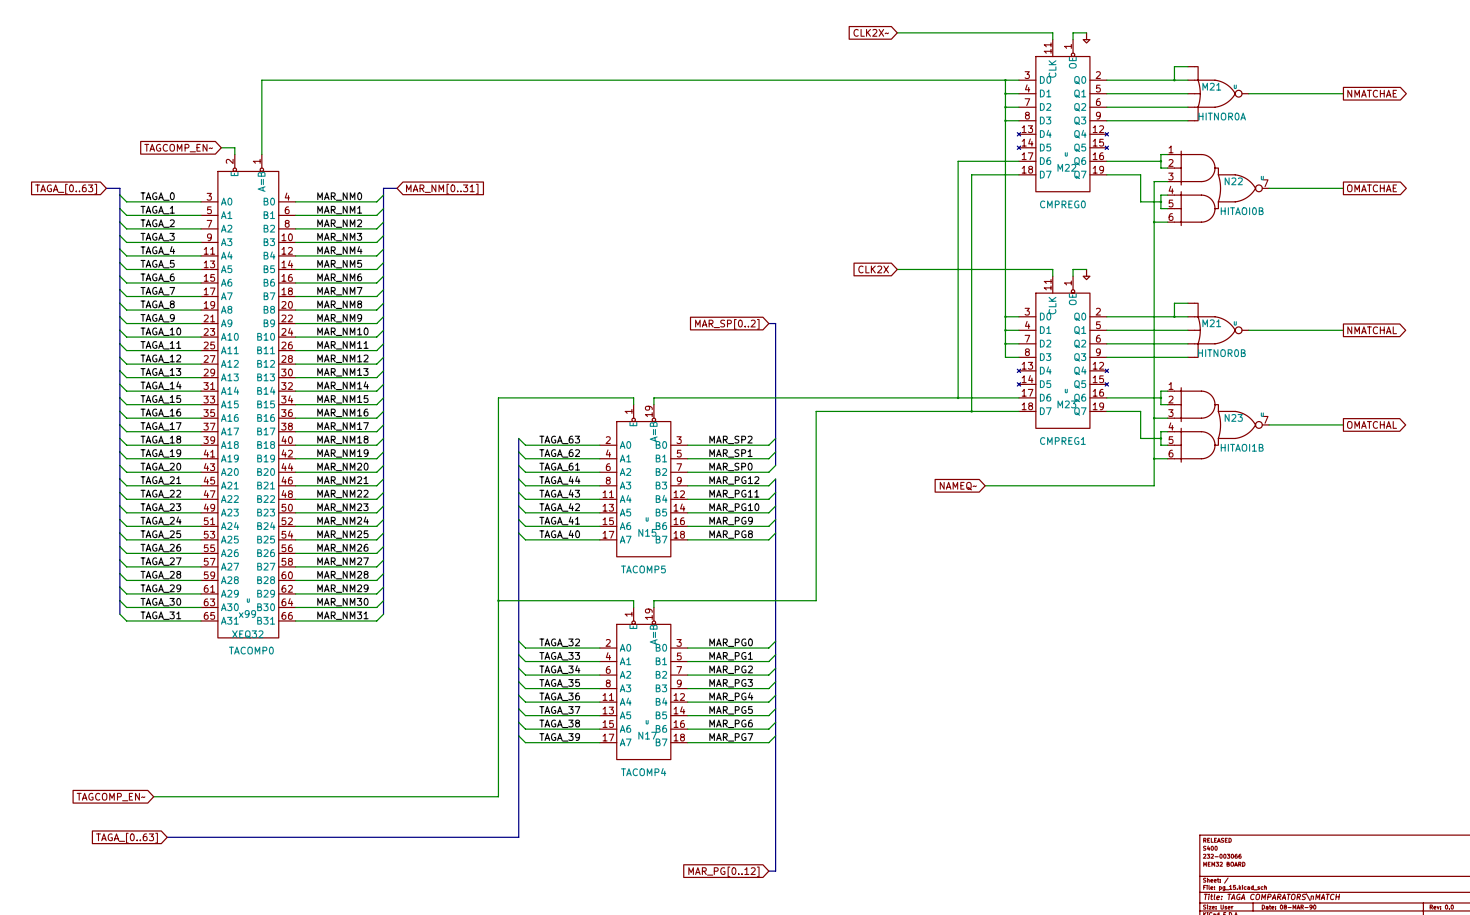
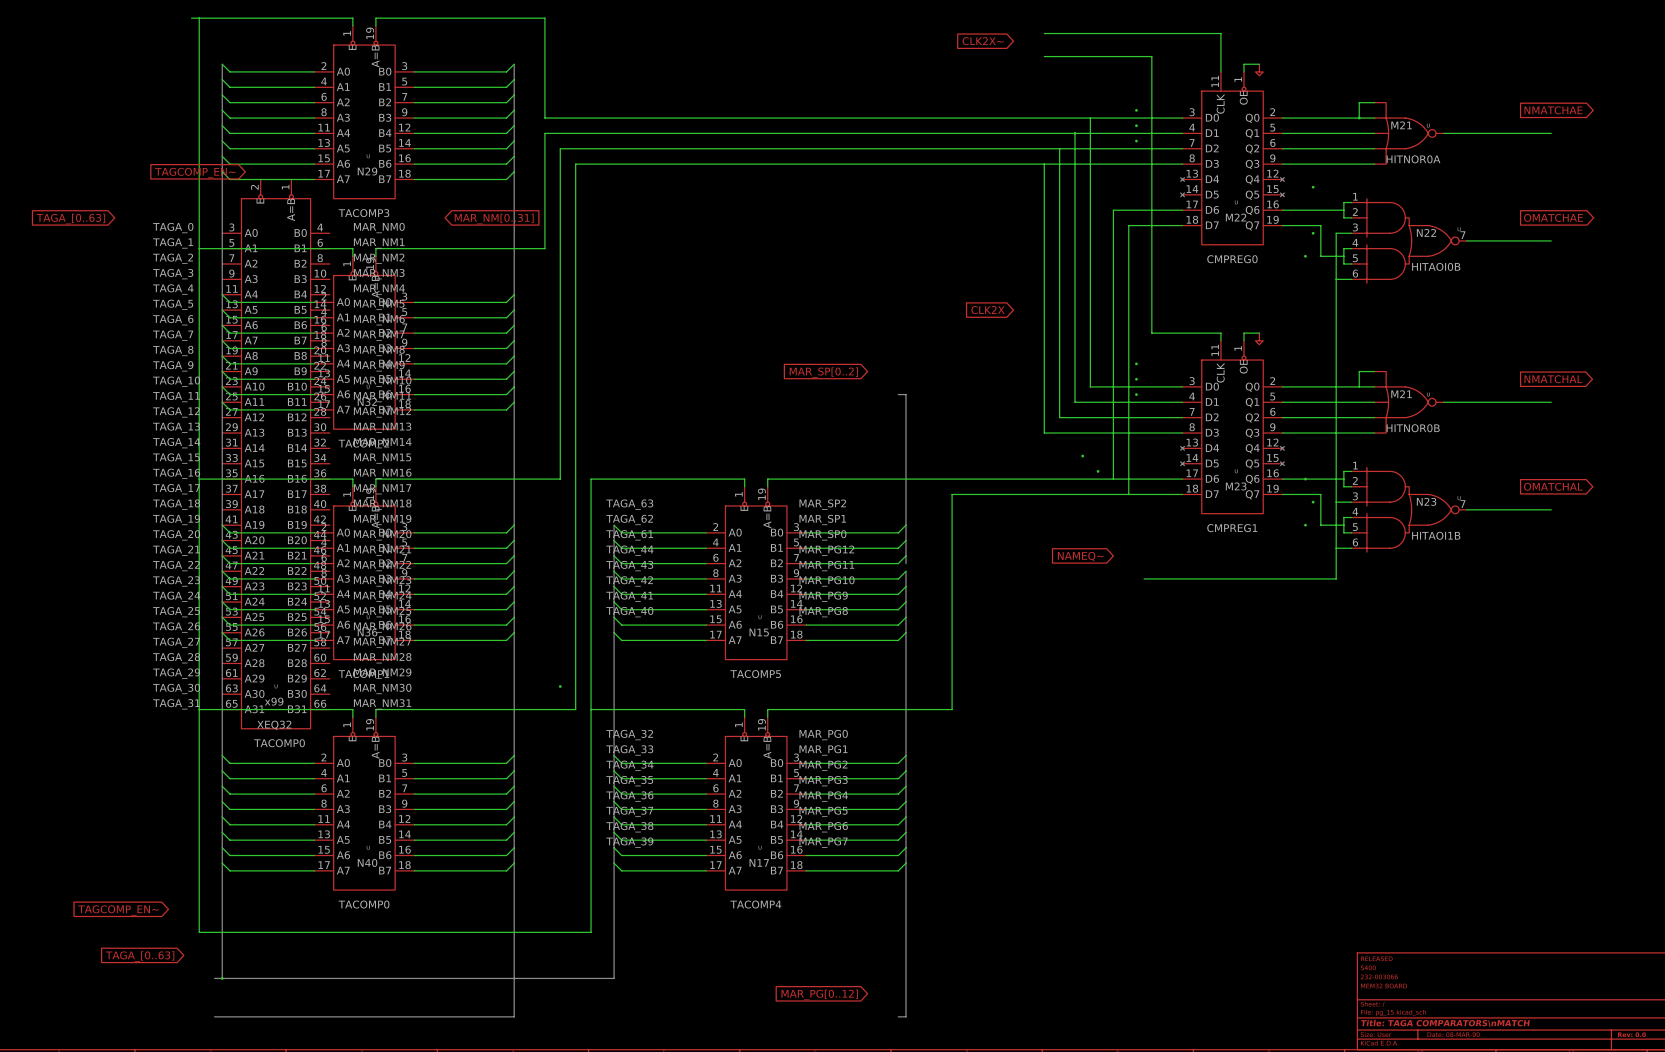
wire: none -> (191, 18) (352, 18) (352, 25)
wire: none -> (199, 18) (199, 932) (591, 932) (591, 479) (744, 479) (744, 486)
wire: none -> (375, 25) (375, 18) (544, 18) (544, 118) (1182, 118)
wire: none -> (1044, 33) (1220, 33) (1220, 71)
wire: (897, 32) (1052, 32) (1052, 39) -> none
wire: (1086, 32) (1073, 32) (1073, 39) -> (1259, 64) (1244, 64) (1244, 71)
power symbol position: (1086, 38) -> (1259, 70)
wire: none -> (1044, 56) (1151, 56) (1151, 333) (1220, 333) (1220, 340)
wire: none -> (222, 64) (229, 71) (314, 71)
bus: none -> (222, 64) (222, 978)
wire: none -> (514, 64) (506, 71) (414, 71)
bus: none -> (514, 64) (514, 1016) (214, 1016)
wire: none -> (222, 79) (229, 87) (314, 87)
wire: none -> (514, 79) (506, 87) (414, 87)
wire: (1187, 66) (1174, 66) (1174, 80) -> (1374, 102) (1359, 102) (1359, 118)
wire: none -> (222, 94) (229, 102) (314, 102)
wire: none -> (514, 94) (506, 102) (414, 102)
wire: (1005, 80) (1005, 357) (1018, 357) -> none
wire: (1018, 80) (261, 80) (261, 154) -> none
wire: (1106, 80) (1187, 80) -> (1282, 118) (1374, 118)
wire: none -> (222, 110) (229, 118) (314, 118)
wire: none -> (514, 110) (506, 118) (414, 118)
wire: (1005, 93) (1018, 93) -> none
wire: (1106, 93) (1187, 93) -> (1282, 133) (1374, 133)
part position: (1218, 93) -> (1409, 133)
wire: (1248, 93) (1343, 93) -> (1443, 133) (1551, 133)
part: none -> (364, 112)
wire: none -> (1090, 118) (1090, 386) (1182, 386)
wire: none -> (222, 125) (229, 133) (314, 133)
wire: none -> (514, 125) (506, 133) (414, 133)
wire: (1005, 107) (1018, 107) -> none
wire: (1106, 107) (1187, 107) -> (1282, 148) (1374, 148)
wire: none -> (1075, 133) (1075, 402) (1182, 402)
junction: none -> (1075, 133)
part position: (1062, 115) -> (1232, 158)
wire: none -> (222, 141) (229, 148) (314, 148)
wire: none -> (514, 141) (506, 148) (414, 148)
wire: (1005, 120) (1018, 120) -> none
wire: (1106, 120) (1187, 120) -> (1282, 164) (1374, 164)
wire: none -> (1059, 148) (1059, 417) (1182, 417)
wire: none -> (222, 156) (229, 164) (314, 164)
wire: none -> (514, 156) (506, 164) (414, 164)
no-connect mark: (1018, 134) -> none
no-connect mark: (1106, 134) -> none
wire: none -> (1044, 164) (1044, 433) (1182, 433)
wire: none -> (222, 171) (229, 179) (314, 179)
wire: (221, 147) (234, 147) (234, 154) -> none
wire: none -> (514, 171) (506, 179) (414, 179)
no-connect mark: (1018, 147) -> none
no-connect mark: (1106, 147) -> none
no-connect mark: none -> (1182, 179)
no-connect mark: none -> (1282, 179)
wire: (1167, 154) (1160, 154) (1160, 168) (1167, 168) -> (1351, 202) (1343, 202) (1343, 217) (1351, 217)
wire: (1018, 161) (958, 161) (958, 397) -> (1182, 210) (1113, 210) (1113, 479)
wire: (1106, 161) (1160, 161) -> none
no-connect mark: none -> (1182, 194)
no-connect mark: none -> (1282, 194)
wire: (1018, 174) (971, 174) (971, 411) -> (1182, 225) (1128, 225) (1128, 494)
wire: (1106, 174) (1140, 174) (1140, 201) (1160, 201) -> none
wire: (1154, 181) (1154, 485) (985, 485) -> (1305, 210) (1282, 210)
bus: (106, 188) (119, 188) (119, 614) -> none
bus: (397, 188) (383, 188) (383, 614) -> none
part position: (1218, 188) -> (1409, 240)
wire: (1269, 188) (1343, 188) -> (1466, 240) (1551, 240)
wire: (119, 195) (126, 201) (201, 201) -> none
wire: (383, 195) (376, 201) (295, 201) -> none
wire: (1160, 195) (1160, 208) (1167, 208) -> (1313, 225) (1282, 225)
wire: none -> (1320, 225) (1320, 256) (1343, 256)
wire: none -> (1351, 233) (1336, 233) (1336, 578) (1144, 578)
wire: (119, 208) (126, 215) (180, 215) -> none
wire: (383, 208) (376, 215) -> (1182, 133) (544, 133) (544, 248) (422, 248)
wire: none -> (222, 248) (329, 248)
wire: (315, 215) (336, 215) -> (352, 248) (352, 256)
wire: none -> (375, 248) (375, 256)
wire: none -> (1351, 248) (1343, 248) (1343, 263) (1351, 263)
wire: (119, 222) (126, 228) (201, 228) -> none
wire: (383, 222) (376, 228) (295, 228) -> none
wire: (1154, 222) (1167, 222) -> (1336, 279) (1351, 279)
wire: (119, 235) (126, 242) (201, 242) -> none
wire: (383, 235) (376, 242) (295, 242) -> none
wire: (119, 249) (126, 255) (201, 255) -> (314, 302) (229, 302) (222, 294)
wire: (383, 249) (376, 255) (295, 255) -> none
wire: none -> (514, 294) (506, 302) (414, 302)
wire: (119, 262) (126, 269) (201, 269) -> (314, 317) (229, 317) (222, 310)
wire: (383, 262) (376, 269) (295, 269) -> none
wire: none -> (514, 310) (506, 317) (414, 317)
wire: (897, 269) (1052, 269) (1052, 276) -> none
wire: (1086, 269) (1073, 269) (1073, 276) -> (1259, 333) (1244, 333) (1244, 340)
power symbol position: (1086, 274) -> (1259, 339)
wire: (119, 276) (126, 282) (201, 282) -> (314, 333) (229, 333) (222, 325)
wire: (383, 276) (376, 282) (295, 282) -> none
wire: none -> (514, 325) (506, 333) (414, 333)
wire: (119, 289) (126, 296) (201, 296) -> (314, 348) (229, 348) (222, 340)
wire: (383, 289) (376, 296) (295, 296) -> none
wire: none -> (514, 340) (506, 348) (414, 348)
part: none -> (364, 342)
wire: (119, 303) (126, 310) (201, 310) -> (314, 363) (229, 363) (222, 356)
wire: (383, 303) (376, 310) (295, 310) -> none
wire: (1187, 303) (1174, 303) (1174, 316) -> (1374, 371) (1359, 371) (1359, 386)
wire: none -> (514, 356) (506, 363) (414, 363)
wire: (119, 316) (126, 323) (201, 323) -> (314, 379) (229, 379) (222, 371)
wire: (383, 316) (376, 323) (295, 323) -> none
wire: (1005, 316) (1018, 316) -> none
wire: (1106, 316) (1187, 316) -> (1282, 386) (1374, 386)
wire: none -> (514, 371) (506, 379) (414, 379)
bus: (768, 323) (775, 323) (775, 465) -> none
wire: (119, 330) (126, 337) (201, 337) -> (314, 394) (229, 394) (222, 386)
wire: (383, 330) (376, 337) (295, 337) -> none
wire: (1005, 330) (1018, 330) -> none
wire: (1106, 330) (1187, 330) -> (1282, 402) (1374, 402)
part position: (1218, 330) -> (1409, 402)
wire: (1248, 330) (1343, 330) -> (1443, 402) (1551, 402)
wire: none -> (514, 386) (506, 394) (414, 394)
wire: (119, 343) (126, 350) (201, 350) -> (314, 409) (229, 409) (222, 402)
wire: (383, 343) (376, 350) (295, 350) -> none
bus: none -> (898, 394) (905, 394) (905, 563)
wire: (1005, 343) (1018, 343) -> none
wire: (1106, 343) (1187, 343) -> (1282, 417) (1374, 417)
wire: none -> (514, 402) (506, 409) (414, 409)
part position: (1062, 352) -> (1232, 427)
wire: (119, 357) (126, 364) (201, 364) -> none
wire: (383, 357) (376, 364) (295, 364) -> none
wire: (1106, 357) (1187, 357) -> (1282, 433) (1374, 433)
wire: (119, 370) (126, 377) (201, 377) -> none
wire: (383, 370) (376, 377) (295, 377) -> none
no-connect mark: (1018, 370) -> none
no-connect mark: (1106, 370) -> none
wire: (119, 384) (126, 391) (201, 391) -> none
wire: (383, 384) (376, 391) (295, 391) -> none
no-connect mark: (1018, 384) -> none
no-connect mark: (1106, 384) -> none
no-connect mark: none -> (1182, 448)
no-connect mark: none -> (1282, 448)
wire: (1167, 391) (1160, 391) (1160, 404) (1167, 404) -> (1351, 471) (1343, 471) (1343, 486) (1351, 486)
wire: (119, 397) (126, 404) (201, 404) -> none
wire: (383, 397) (376, 404) (295, 404) -> none
wire: (498, 397) (633, 397) (633, 404) -> (560, 456) (560, 148) (1182, 148)
wire: (1018, 397) (653, 397) (653, 404) -> (1182, 479) (767, 479) (767, 486)
wire: (1106, 397) (1160, 397) -> none
no-connect mark: none -> (1182, 463)
no-connect mark: none -> (1282, 463)
wire: (119, 411) (126, 418) (180, 418) -> none
wire: (383, 411) (376, 418) -> (560, 479) (422, 479)
wire: (1018, 411) (816, 411) (816, 600) (653, 600) (653, 607) -> (1182, 494) (952, 494) (952, 709) (767, 709) (767, 717)
wire: (1106, 411) (1140, 411) (1140, 438) (1160, 438) -> none
wire: none -> (222, 479) (329, 479)
wire: (315, 418) (336, 418) -> (352, 479) (352, 486)
wire: none -> (375, 479) (375, 486)
wire: (498, 418) (498, 796) (153, 796) -> none
wire: none -> (1282, 479) (1305, 479)
wire: (119, 424) (126, 431) (201, 431) -> none
wire: (383, 424) (376, 431) (295, 431) -> none
part position: (1218, 424) -> (1409, 509)
wire: (1269, 424) (1343, 424) -> (1466, 509) (1551, 509)
wire: (1160, 431) (1160, 445) (1167, 445) -> (1313, 494) (1282, 494)
wire: none -> (1320, 494) (1320, 525) (1343, 525)
wire: (119, 438) (126, 445) (201, 445) -> none
wire: (383, 438) (376, 445) (295, 445) -> none
wire: (518, 438) (525, 445) (599, 445) -> (614, 525) (621, 532) (706, 532)
bus: (518, 438) (518, 837) (167, 837) -> (614, 525) (614, 978) (214, 978)
wire: (775, 438) (768, 445) (687, 445) -> (905, 525) (898, 532) (806, 532)
wire: none -> (1336, 502) (1351, 502)
wire: (119, 451) (126, 458) (201, 458) -> (314, 532) (229, 532) (222, 525)
wire: (383, 451) (376, 458) (295, 458) -> none
wire: (518, 451) (525, 458) (599, 458) -> (614, 540) (621, 548) (706, 548)
wire: (775, 451) (768, 458) (687, 458) -> (905, 540) (898, 548) (806, 548)
wire: none -> (1351, 517) (1343, 517) (1343, 532) (1351, 532)
wire: none -> (514, 525) (506, 532) (414, 532)
wire: (1154, 458) (1167, 458) -> (1336, 548) (1351, 548)
wire: (119, 465) (126, 472) (201, 472) -> (314, 548) (229, 548) (222, 540)
wire: (383, 465) (376, 472) (295, 472) -> none
wire: (518, 465) (525, 472) (599, 472) -> (614, 555) (621, 563) (706, 563)
wire: (775, 465) (768, 472) (687, 472) -> (905, 555) (898, 563) (806, 563)
wire: none -> (514, 540) (506, 548) (414, 548)
wire: (119, 479) (126, 485) (201, 485) -> (314, 563) (229, 563) (222, 555)
wire: (383, 479) (376, 485) (295, 485) -> none
wire: (518, 479) (525, 485) (599, 485) -> (614, 571) (621, 578) (706, 578)
wire: (775, 479) (768, 485) (687, 485) -> (905, 571) (898, 578) (806, 578)
bus: (775, 479) (775, 871) (768, 871) -> (905, 571) (905, 1016) (898, 1016)
part position: (643, 480) -> (756, 573)
wire: none -> (514, 555) (506, 563) (414, 563)
wire: (119, 492) (126, 499) (201, 499) -> (314, 578) (229, 578) (222, 571)
wire: (383, 492) (376, 499) (295, 499) -> none
wire: (518, 492) (525, 499) (599, 499) -> (614, 586) (621, 594) (706, 594)
wire: (775, 492) (768, 499) (687, 499) -> (905, 586) (898, 594) (806, 594)
wire: none -> (514, 571) (506, 578) (414, 578)
part: none -> (364, 573)
wire: (119, 506) (126, 512) (201, 512) -> (314, 594) (229, 594) (222, 586)
wire: (383, 506) (376, 512) (295, 512) -> none
wire: (518, 506) (525, 512) (599, 512) -> (614, 602) (621, 609) (706, 609)
wire: (775, 506) (768, 512) (687, 512) -> (905, 602) (898, 609) (806, 609)
wire: none -> (514, 586) (506, 594) (414, 594)
wire: (119, 519) (126, 526) (201, 526) -> (314, 609) (229, 609) (222, 602)
wire: (383, 519) (376, 526) (295, 526) -> none
wire: (518, 519) (525, 526) (599, 526) -> (614, 617) (621, 625) (706, 625)
wire: (775, 519) (768, 526) (687, 526) -> (905, 617) (898, 625) (806, 625)
wire: none -> (514, 602) (506, 609) (414, 609)
wire: (119, 533) (126, 539) (201, 539) -> (314, 625) (229, 625) (222, 617)
wire: (383, 533) (376, 539) (295, 539) -> none
wire: (518, 533) (525, 539) (599, 539) -> (614, 632) (621, 640) (706, 640)
wire: (775, 533) (768, 539) (687, 539) -> (905, 632) (898, 640) (806, 640)
wire: none -> (514, 617) (506, 625) (414, 625)
wire: (119, 546) (126, 553) (201, 553) -> (314, 640) (229, 640) (222, 632)
wire: (383, 546) (376, 553) (295, 553) -> none
wire: none -> (514, 632) (506, 640) (414, 640)
wire: (119, 560) (126, 566) (201, 566) -> none
wire: (383, 560) (376, 566) (295, 566) -> none
wire: (119, 573) (126, 580) (201, 580) -> none
wire: (383, 573) (376, 580) (295, 580) -> none
wire: (119, 587) (126, 593) (201, 593) -> none
wire: (383, 587) (376, 593) (295, 593) -> none
wire: (119, 600) (126, 607) (201, 607) -> none
wire: (383, 600) (376, 607) (295, 607) -> none
wire: (498, 600) (633, 600) (633, 607) -> (591, 709) (744, 709) (744, 717)
wire: (119, 614) (126, 620) (180, 620) -> none
wire: (383, 614) (376, 620) -> (1182, 164) (575, 164) (575, 709) (422, 709)
wire: none -> (222, 709) (329, 709)
wire: (315, 620) (336, 620) -> (352, 709) (352, 717)
wire: none -> (375, 709) (375, 717)
wire: (518, 641) (525, 648) (599, 648) -> (614, 755) (621, 763) (706, 763)
wire: (775, 641) (768, 648) (687, 648) -> (905, 755) (898, 763) (806, 763)
wire: (518, 654) (525, 661) (599, 661) -> (614, 771) (621, 778) (706, 778)
wire: (775, 654) (768, 661) (687, 661) -> (905, 771) (898, 778) (806, 778)
wire: none -> (222, 755) (229, 763) (314, 763)
wire: none -> (514, 755) (506, 763) (414, 763)
wire: (518, 668) (525, 675) (599, 675) -> (614, 786) (621, 794) (706, 794)
wire: (775, 668) (768, 675) (687, 675) -> (905, 786) (898, 794) (806, 794)
wire: none -> (222, 771) (229, 778) (314, 778)
wire: none -> (514, 771) (506, 778) (414, 778)
wire: (518, 681) (525, 688) (599, 688) -> (614, 801) (621, 809) (706, 809)
wire: (775, 681) (768, 688) (687, 688) -> (905, 801) (898, 809) (806, 809)
part position: (643, 683) -> (756, 803)
wire: none -> (222, 786) (229, 794) (314, 794)
wire: none -> (514, 786) (506, 794) (414, 794)
wire: (518, 695) (525, 702) (599, 702) -> (614, 817) (621, 824) (706, 824)
wire: (775, 695) (768, 702) (687, 702) -> (905, 817) (898, 824) (806, 824)
wire: none -> (222, 801) (229, 809) (314, 809)
wire: none -> (514, 801) (506, 809) (414, 809)
part: none -> (364, 803)
wire: (518, 708) (525, 715) (599, 715) -> (614, 832) (621, 840) (706, 840)
wire: (775, 708) (768, 715) (687, 715) -> (905, 832) (898, 840) (806, 840)
wire: none -> (222, 817) (229, 824) (314, 824)
wire: none -> (514, 817) (506, 824) (414, 824)
wire: (518, 722) (525, 729) (599, 729) -> (614, 847) (621, 855) (706, 855)
wire: (775, 722) (768, 729) (687, 729) -> (905, 847) (898, 855) (806, 855)
wire: none -> (222, 832) (229, 840) (314, 840)
wire: none -> (514, 832) (506, 840) (414, 840)
wire: (518, 735) (525, 742) (599, 742) -> (614, 863) (621, 870) (706, 870)
wire: (775, 735) (768, 742) (687, 742) -> (905, 863) (898, 870) (806, 870)
wire: none -> (222, 847) (229, 855) (314, 855)
wire: none -> (514, 847) (506, 855) (414, 855)
wire: none -> (222, 863) (229, 870) (314, 870)
wire: none -> (514, 863) (506, 870) (414, 870)
junction: none -> (222, 978)

